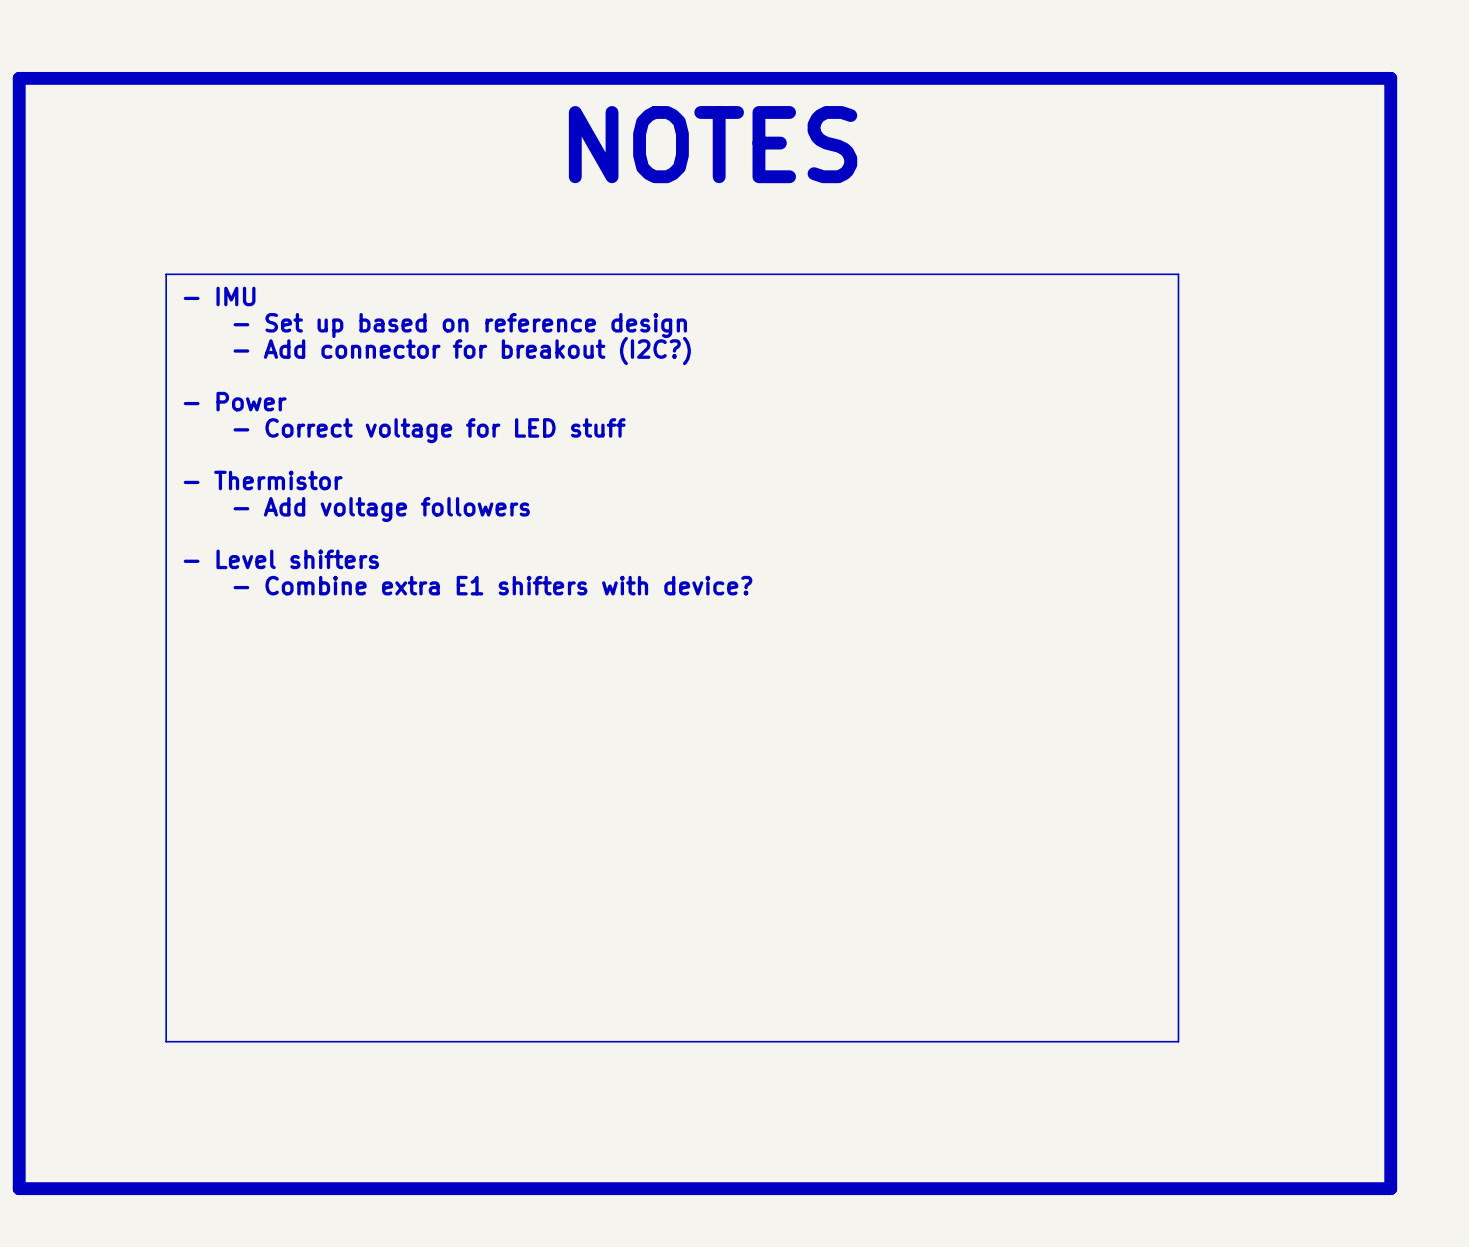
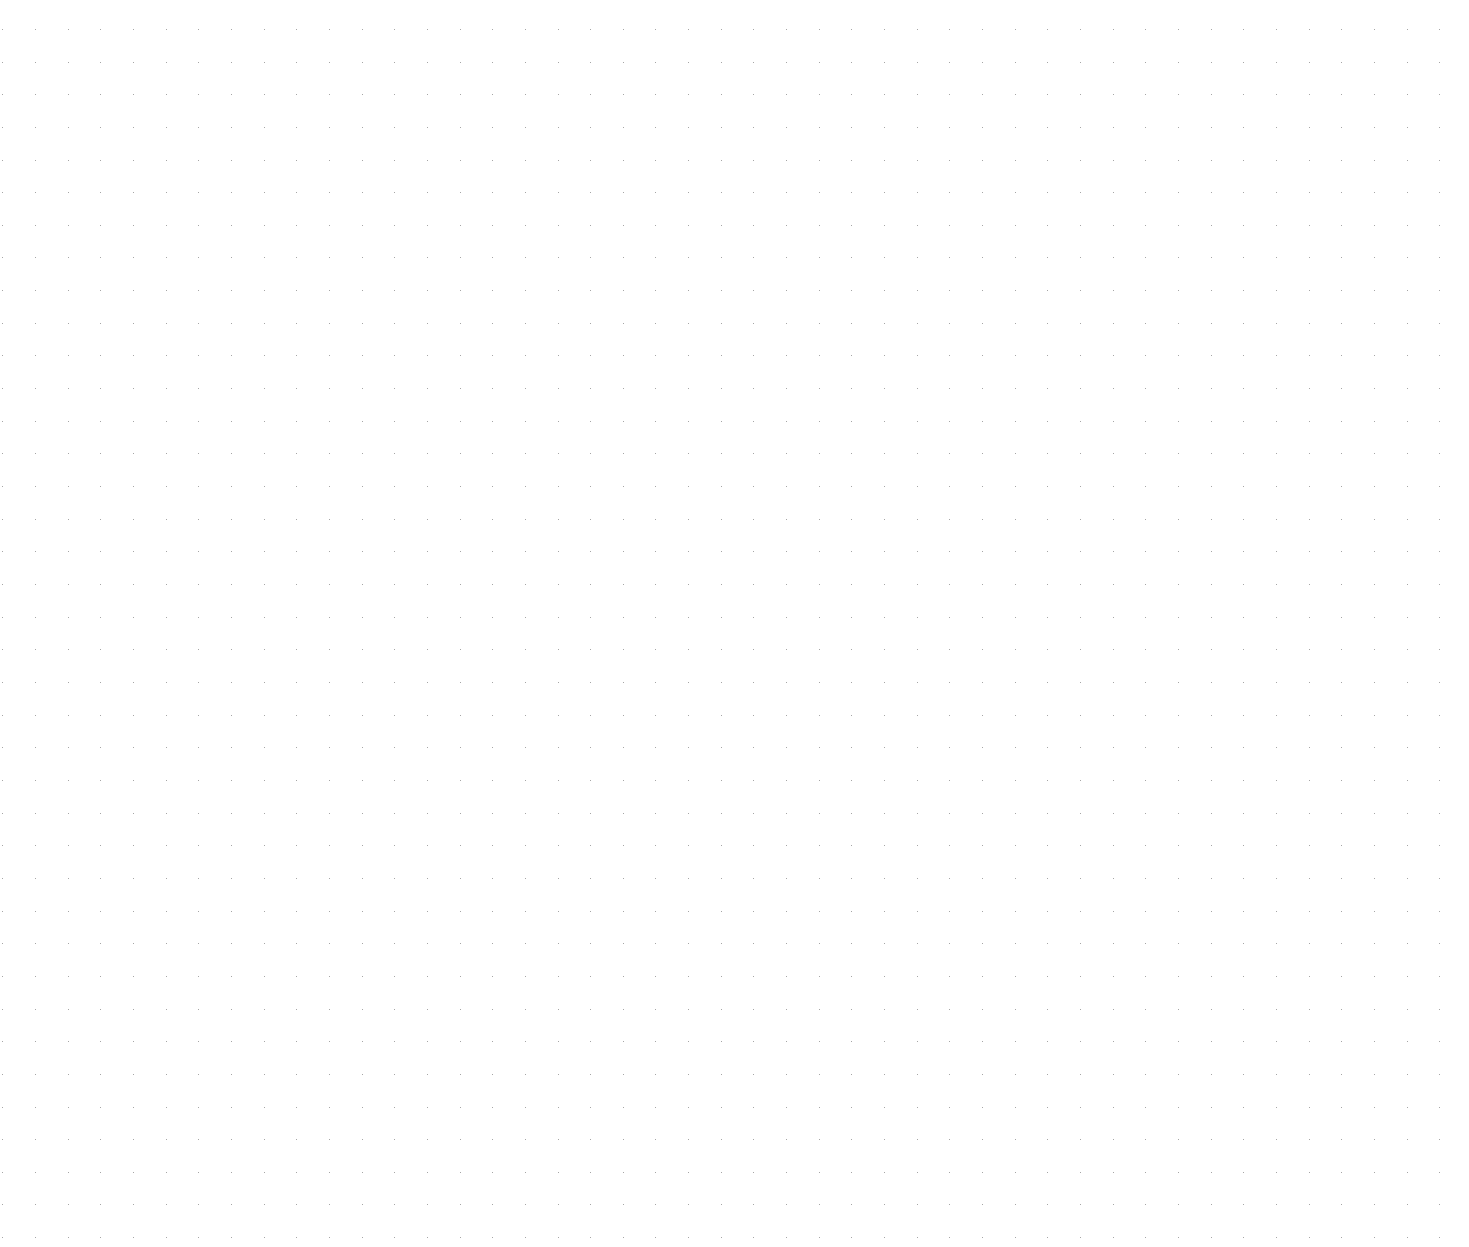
line: (19, 78) (1390, 78) (1390, 1188) (19, 1188) (19, 78) -> none
text: NOTES (713, 144) -> none
line: (166, 274) (1178, 274) (1178, 1041) (166, 1041) (166, 274) -> none
text: - IMU (219, 296) -> none
text: - Set up based on reference design (460, 325) -> none
text: - Add connector for breakout (I2C?) (462, 351) -> none
text: - Power (235, 401) -> none
text: - Correct voltage for LED stuff (429, 430) -> none
text: - Thermistor (263, 480) -> none
text: - Add voltage followers (381, 509) -> none
text: - Level shifters (281, 559) -> none
text: - Combine extra E1 shifters with device? (492, 585) -> none

